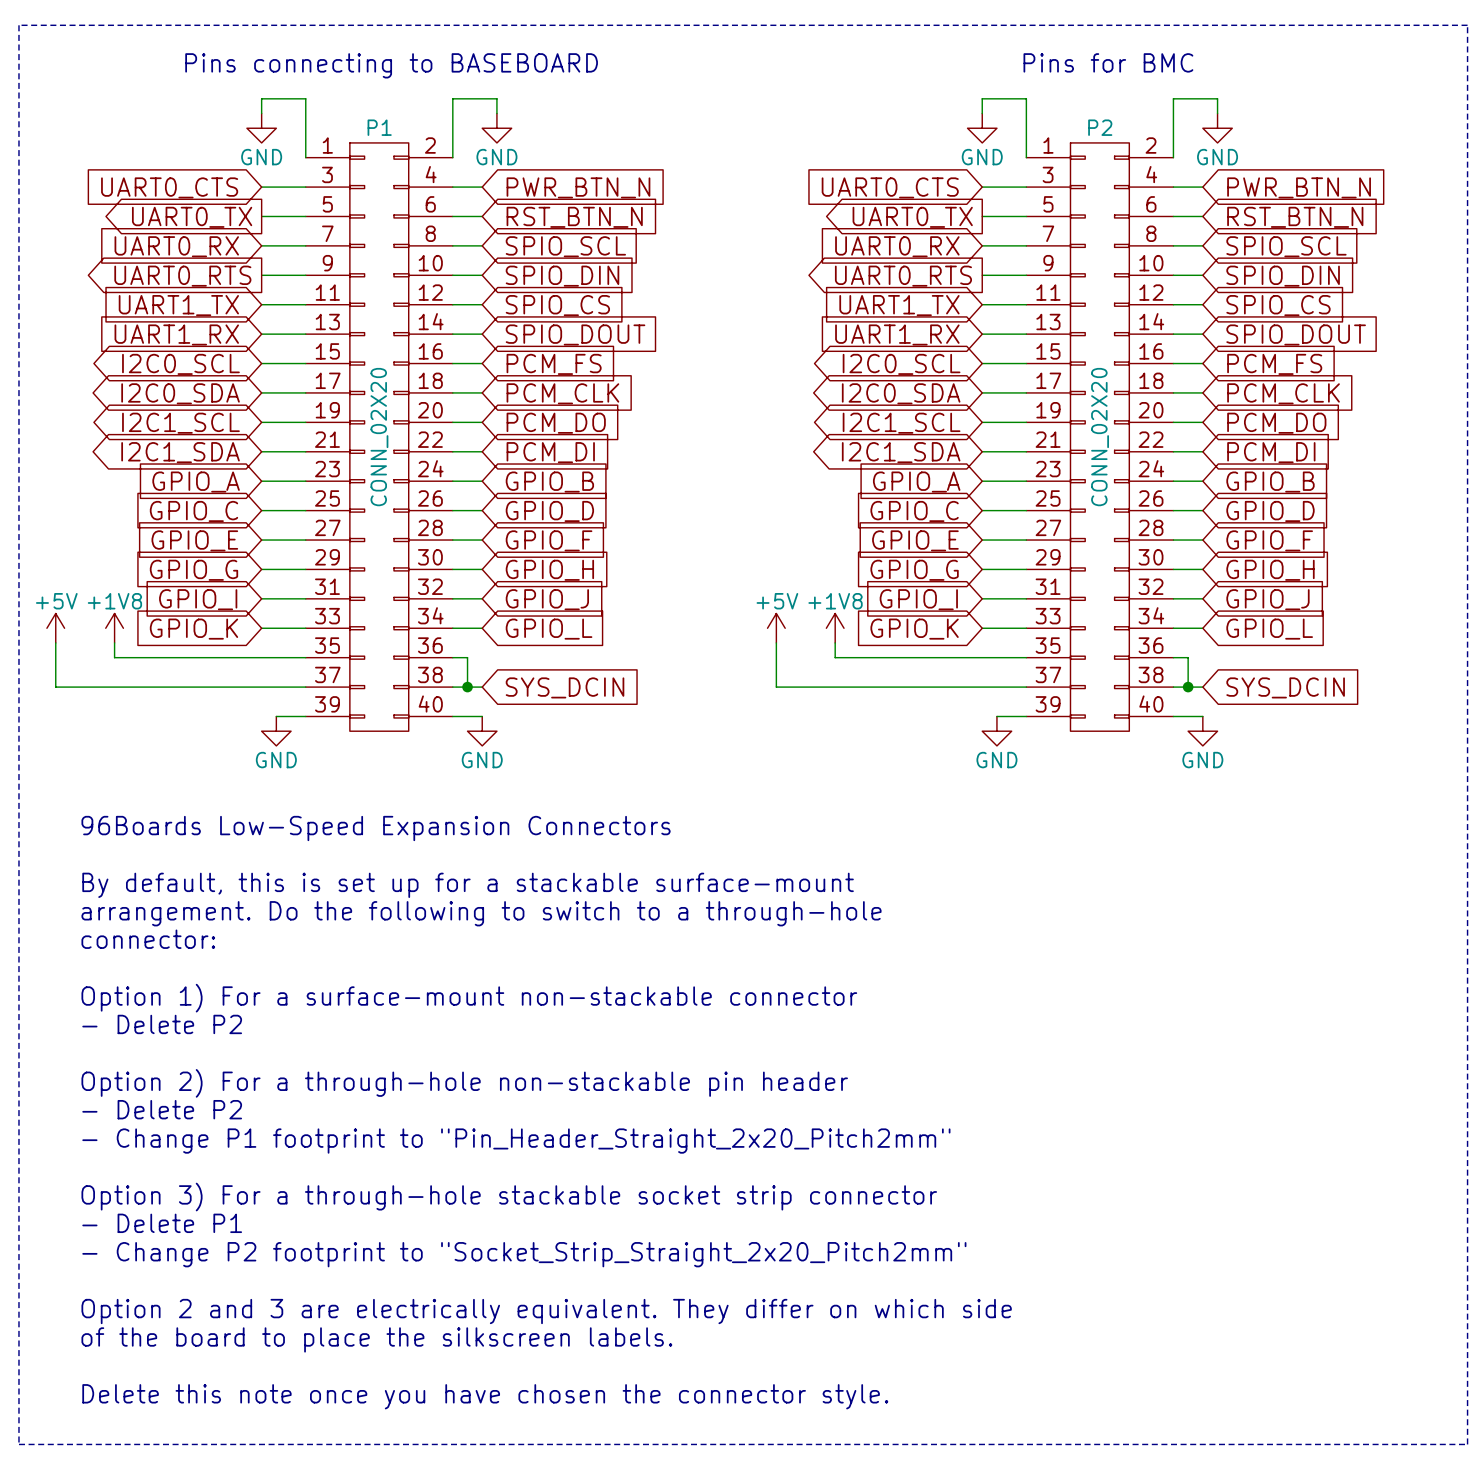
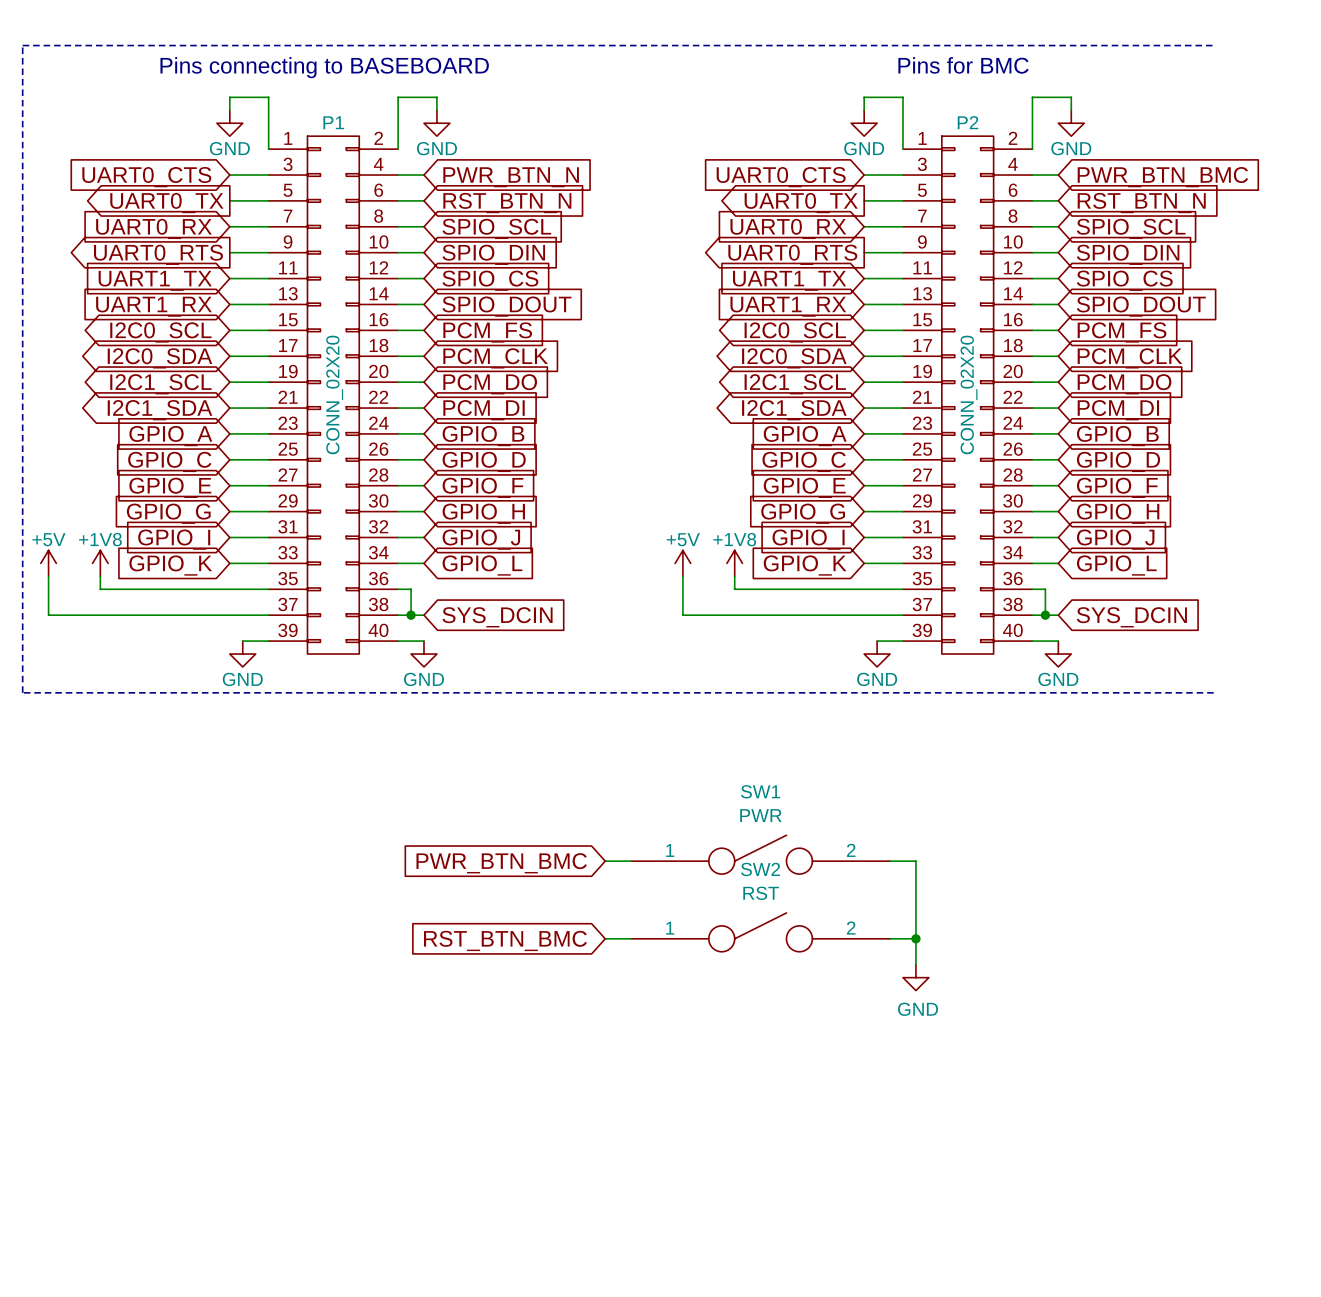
line: (18, 25) (18, 1444) (1467, 1444) (1467, 25) (18, 25) -> none
line: none -> (1213, 45) (22, 45) (22, 692) (1213, 692)
global label: PWR_BTN_N (1299, 187) -> PWR_BTN_BMC (1162, 177)
text: 96Boards Low-Speed Expansion Connectors (376, 828) -> none
text: By default, this is set up for a stackable surface-mount (468, 885) -> none
text: arrangement. Do the following to switch to a through-hole (481, 913) -> none
text: connector: (148, 939) -> none
SW1: none -> PWR (760, 854)
wire: none -> (605, 861) (631, 861)
wire: none -> (890, 861) (915, 861) (915, 964)
global label: none -> PWR_BTN_BMC (501, 863)
text: Option 1) For a surface-mount non-stackable connector (469, 998) -> none
text: - Delete P2 (162, 1024) -> none
SW2: none -> RST (760, 932)
wire: none -> (605, 938) (631, 938)
wire: none -> (890, 938) (915, 938)
junction: none -> (915, 938)
global label: none -> RST_BTN_BMC (505, 940)
text: Option 2) For a through-hole non-stackable pin header (464, 1083) -> none
power symbol: none -> GND (915, 977)
text: - Delete P2 (162, 1109) -> none
text: - Change P1 footprint to "Pin_Header_Straight_2x20_Pitch2mm" (516, 1141) -> none
text: Option 3) For a through-hole stackable socket strip connector (509, 1197) -> none
text: - Delete P1 (162, 1223) -> none
text: - Change P2 footprint to "Socket_Strip_Straight_2x20_Pitch2mm" (524, 1254) -> none
text: Option 2 and 3 are electrically equivalent. They differ on which side (546, 1311) -> none
text: of the board to place the silkscreen labels. (376, 1339) -> none
text: Delete this note once you have chosen the connector style. (485, 1396) -> none

